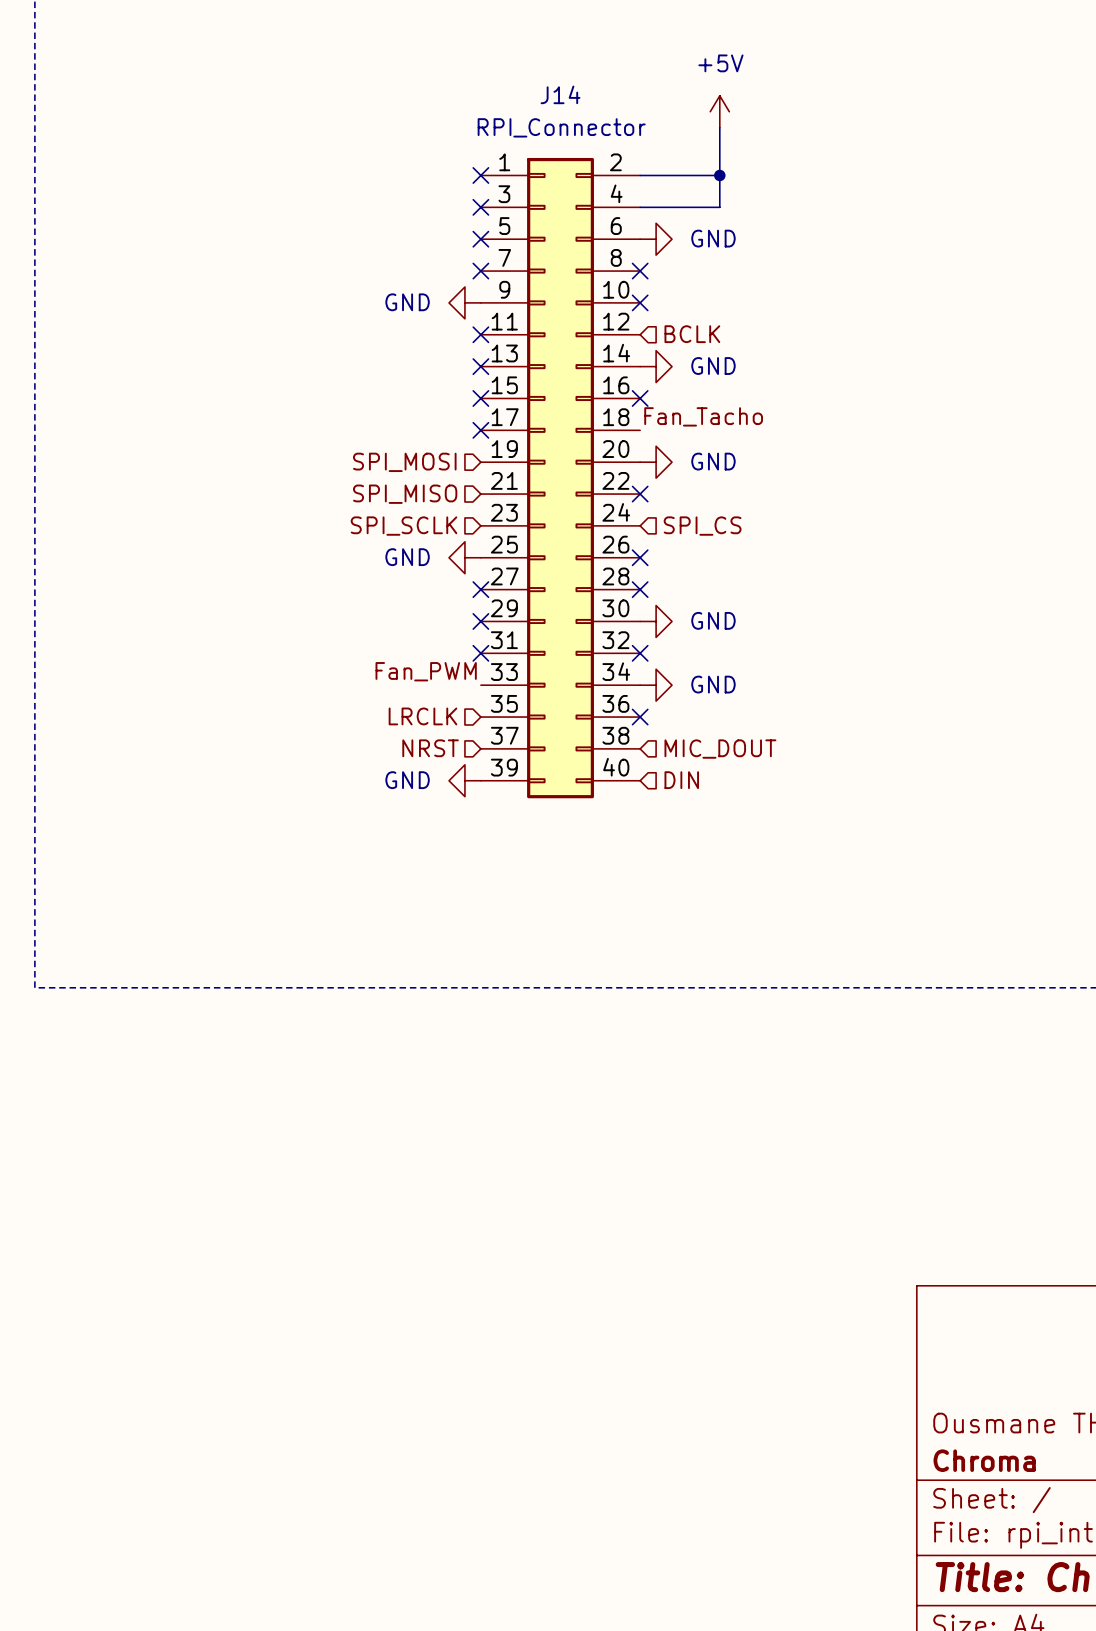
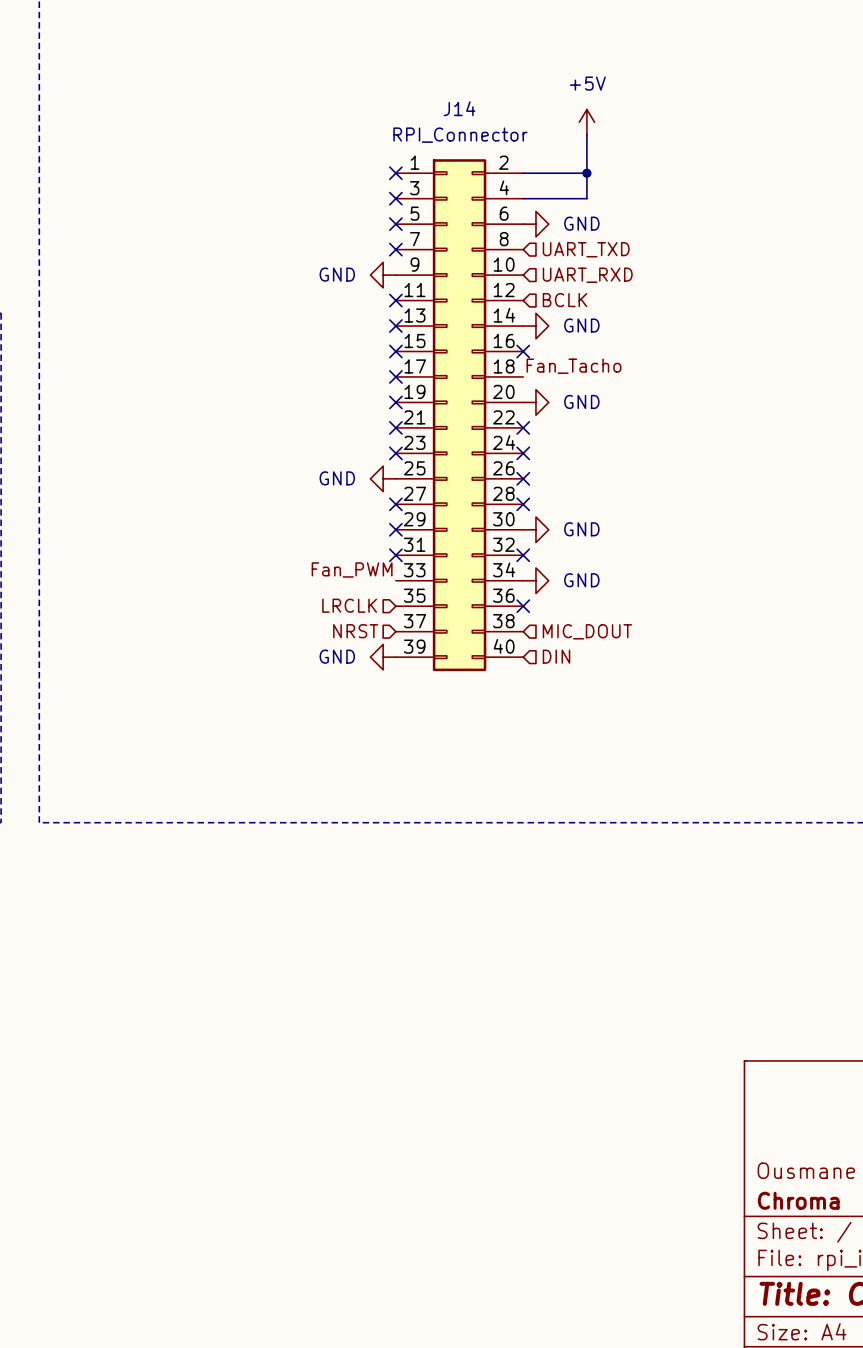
no-connect mark: (640, 271) -> none
hierarchical label: none -> UART_TXD (586, 249)
no-connect mark: (640, 302) -> none
hierarchical label: none -> UART_RXD (587, 275)
hierarchical label: SPI_MOSI (404, 462) -> none
no-connect mark: none -> (395, 402)
hierarchical label: SPI_MISO (405, 494) -> none
no-connect mark: none -> (395, 427)
no-connect mark: none -> (395, 453)
no-connect mark: none -> (523, 453)
hierarchical label: SPI_SCLK (404, 526) -> none
hierarchical label: SPI_CS (702, 526) -> none

